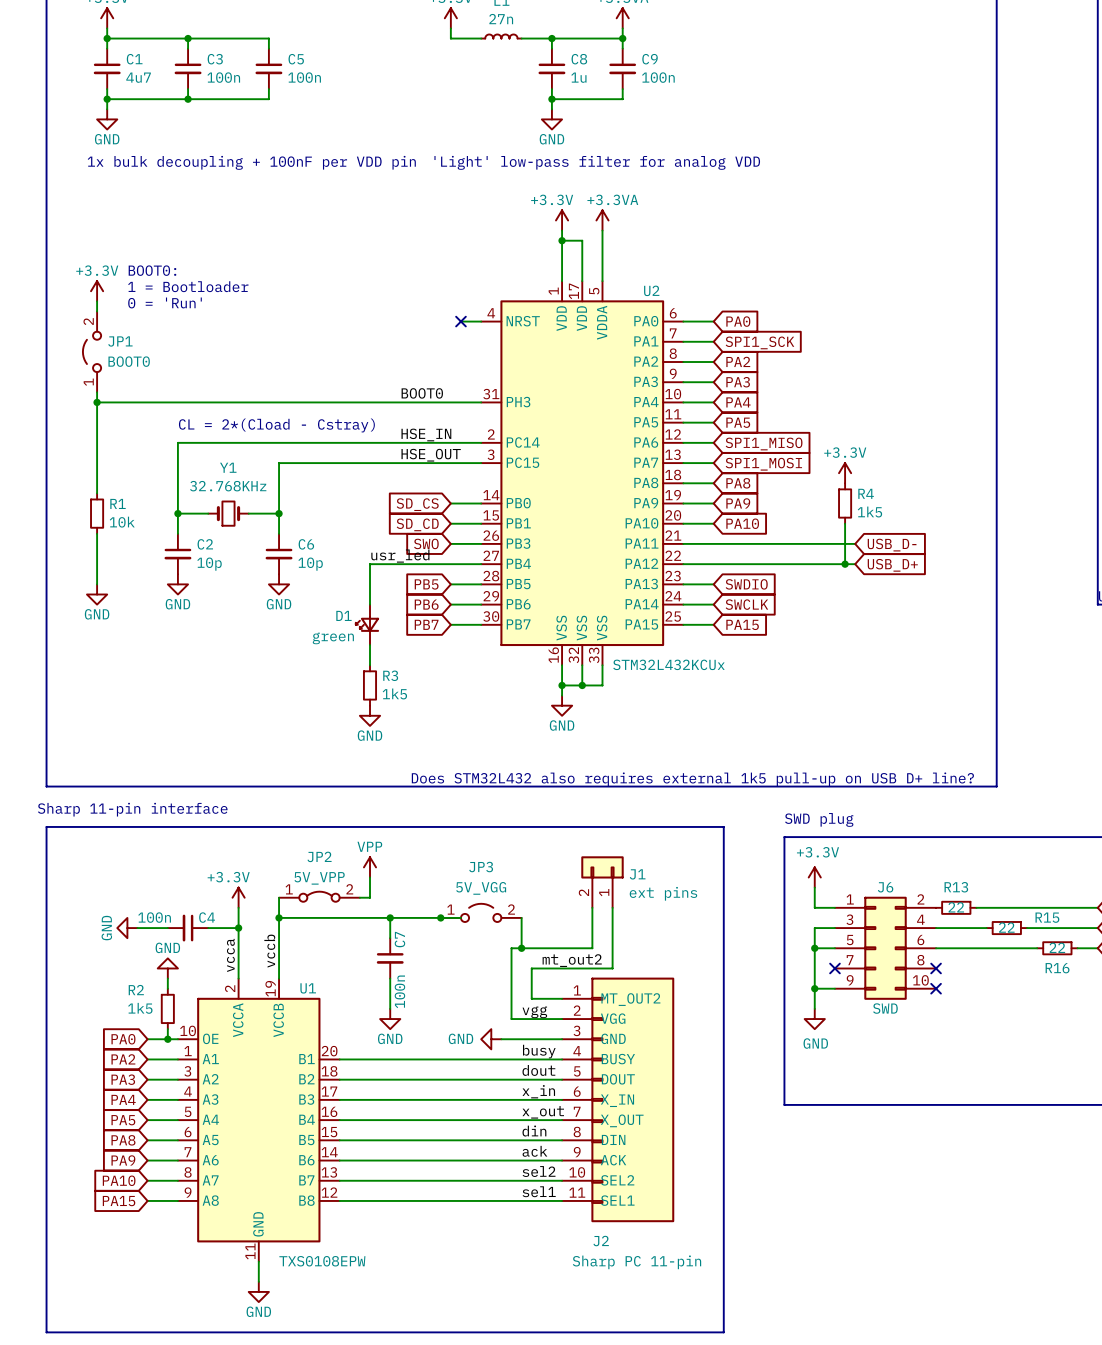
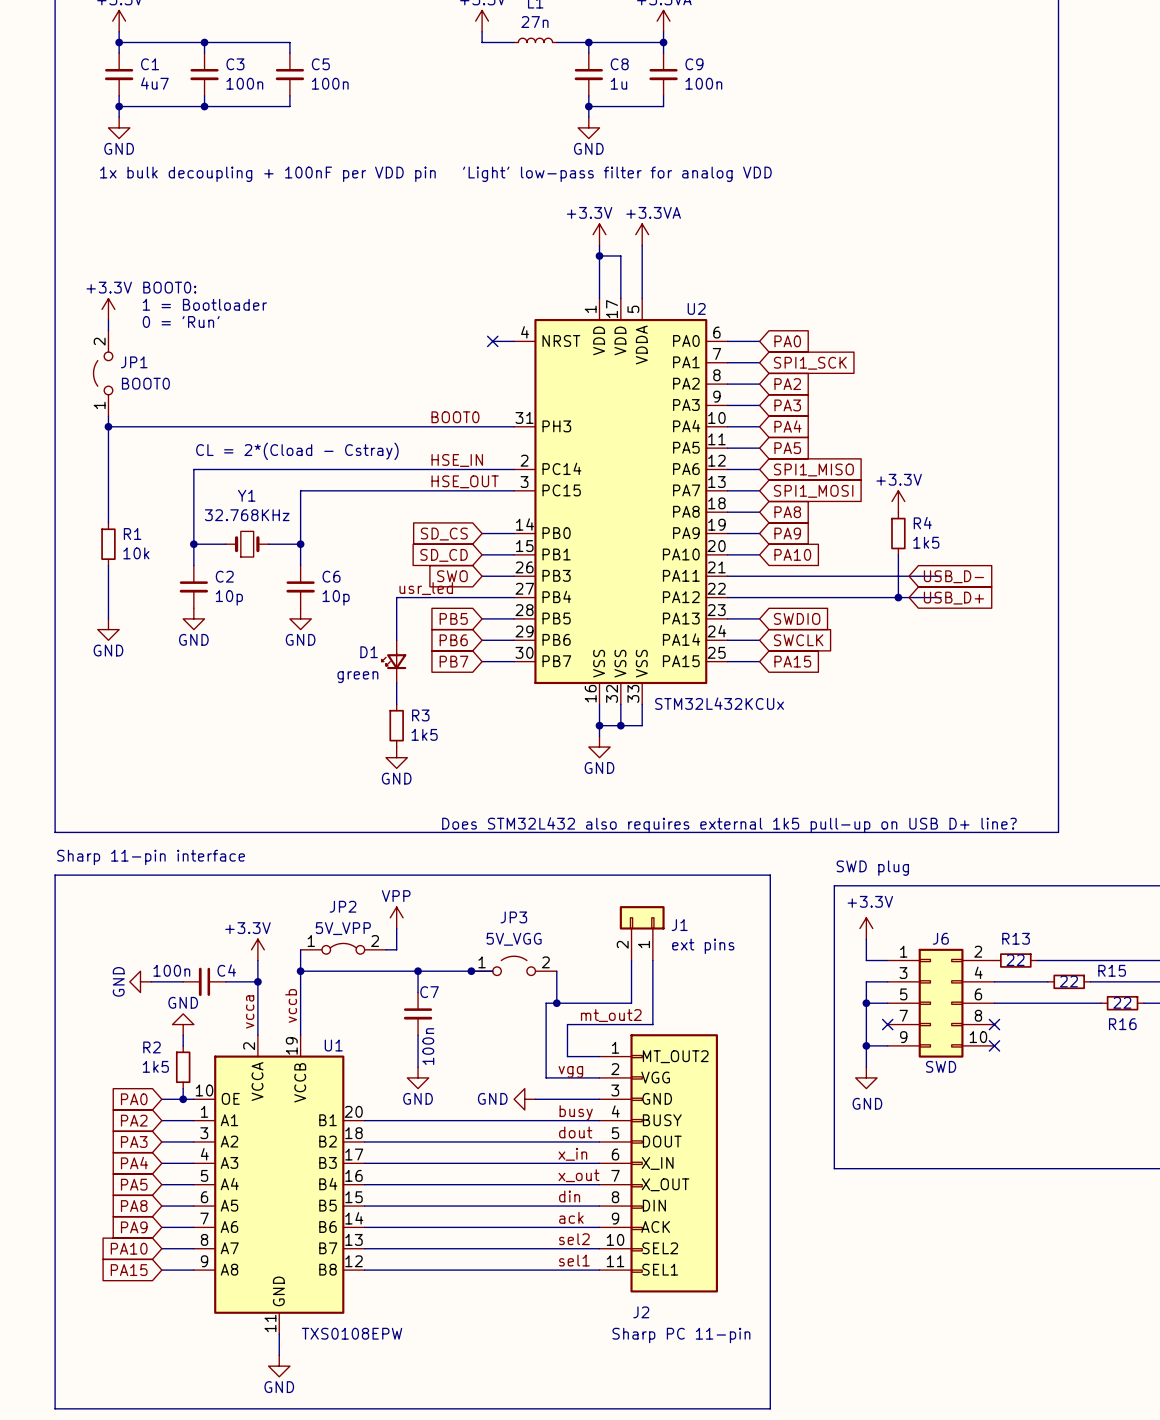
wire: none -> (909, 576) (941, 576)
wire: none -> (909, 597) (941, 597)
C7 name rotation: 0° (399, 939) -> 90° clockwise (429, 992)

